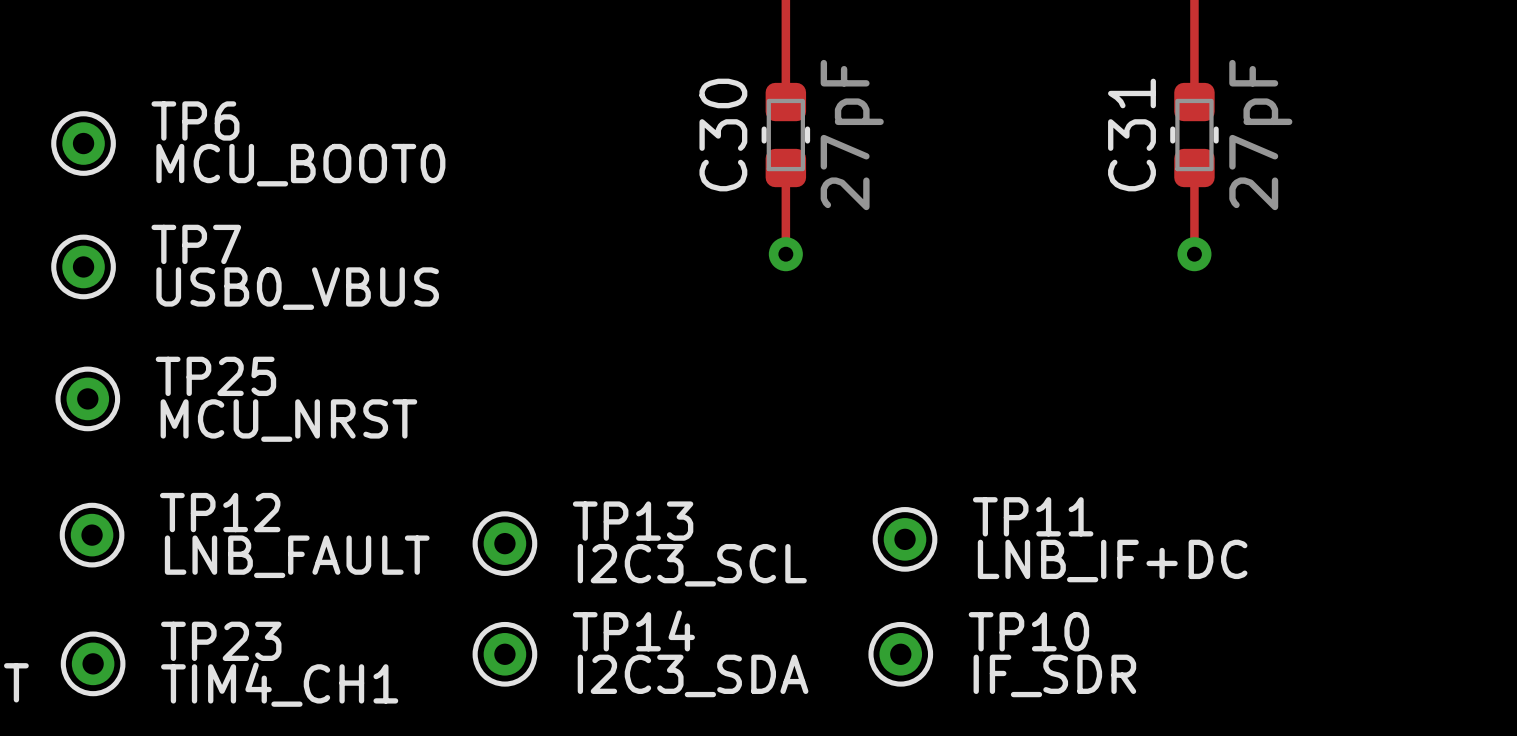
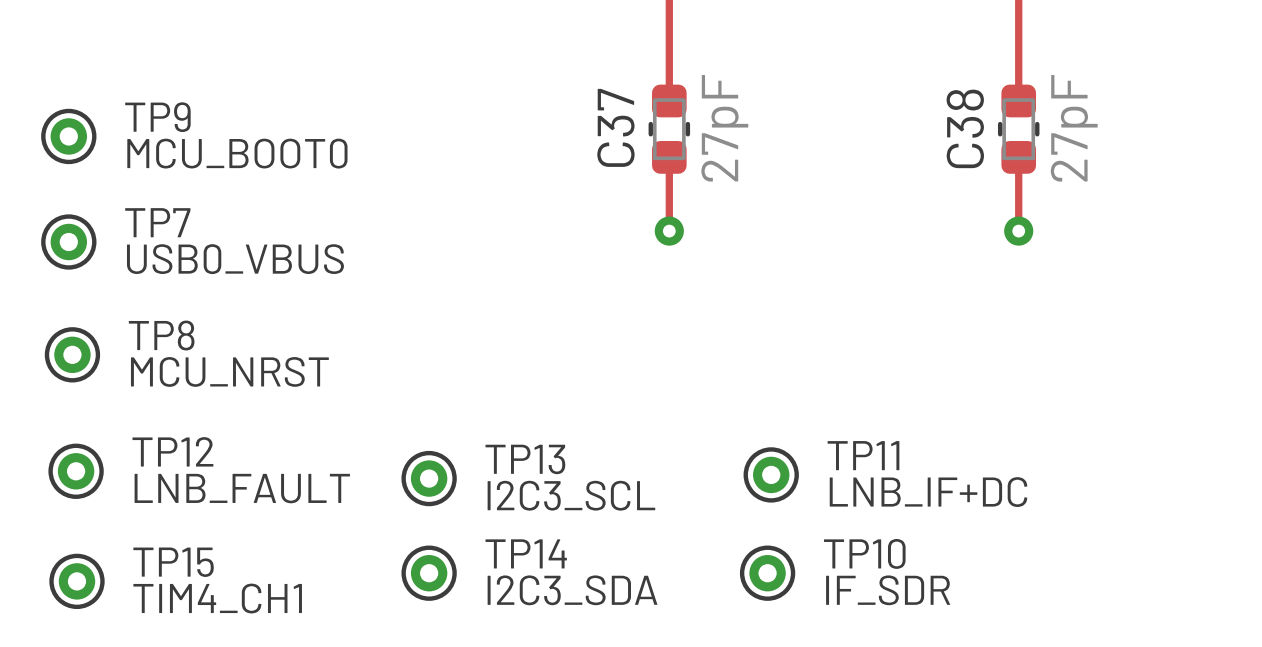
TP6 name: TP6 (195, 120) -> TP9 (157, 117)
C30 name: C30 (723, 135) -> C37 (615, 127)
C31 name: C31 (1132, 135) -> C38 (965, 128)
TP25 name: TP25 (215, 376) -> TP8 (161, 335)
TP23 name: TP23 (221, 641) -> TP15 (173, 562)

